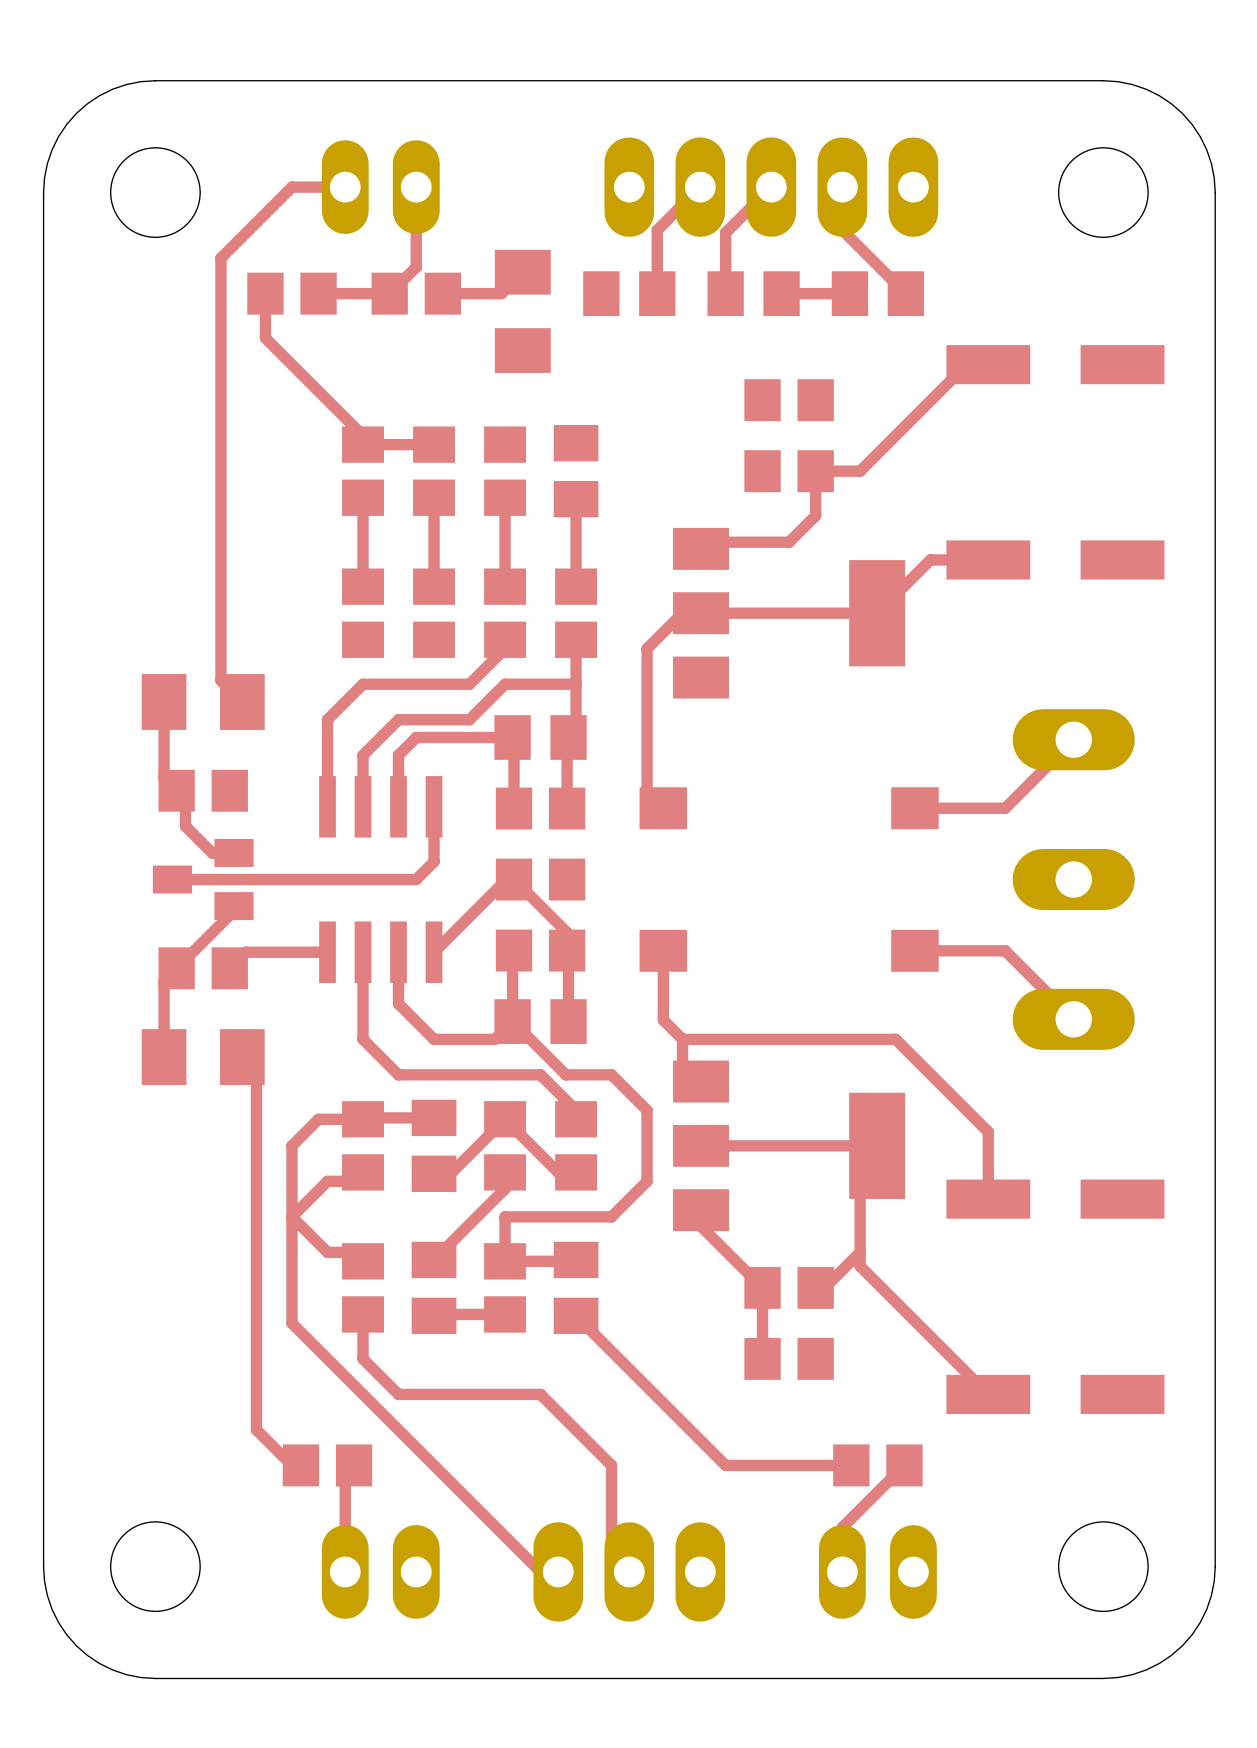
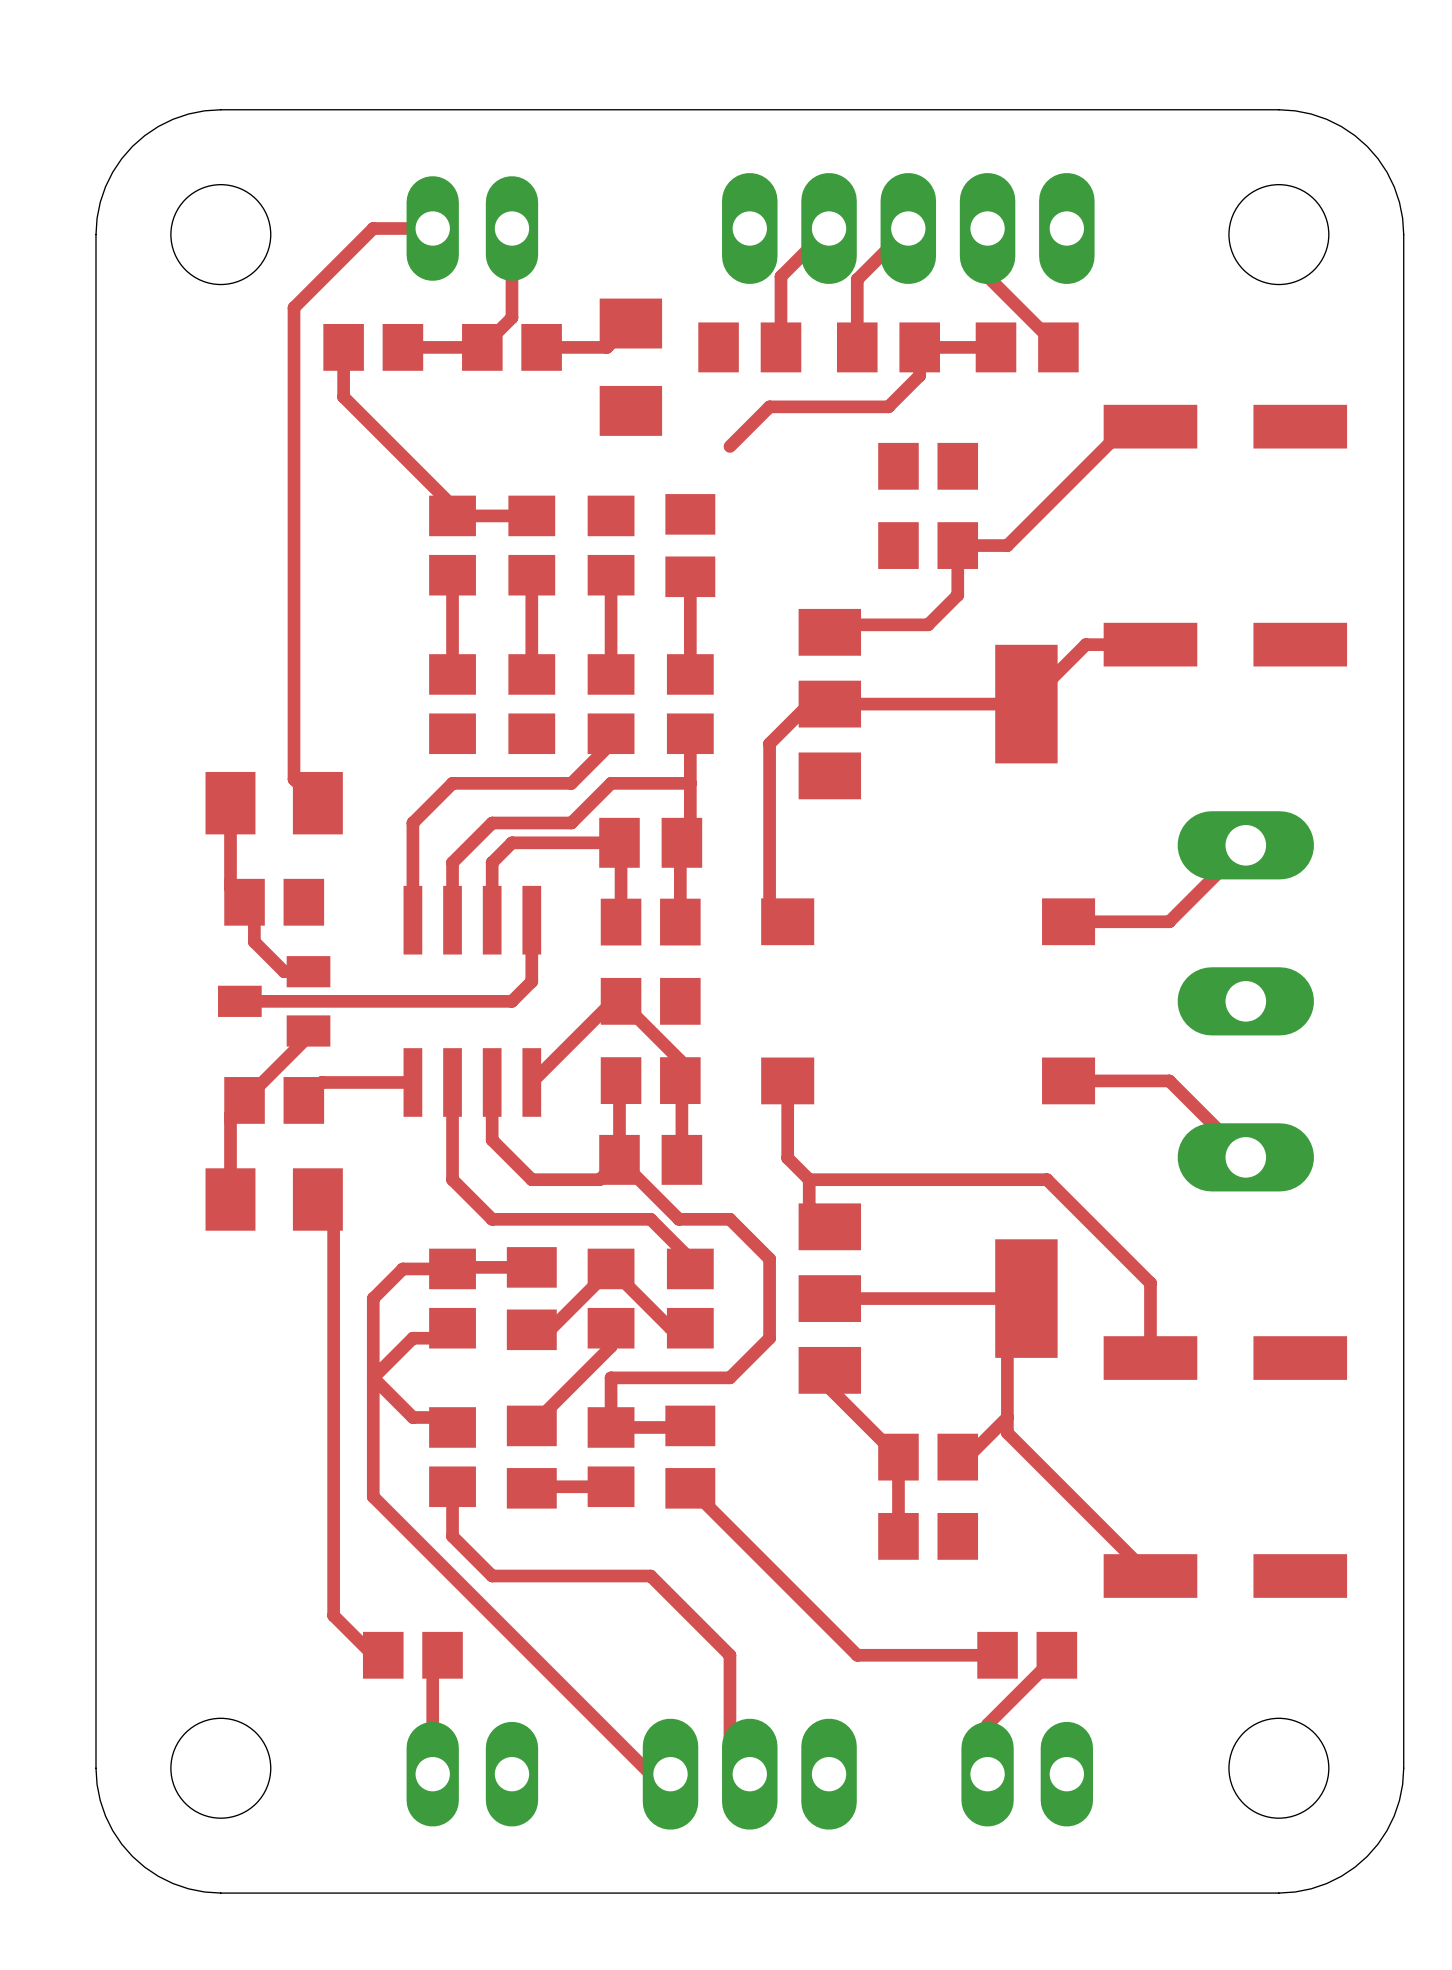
top track: none -> (919, 347) (919, 375) (888, 406) (769, 406) (729, 446)

